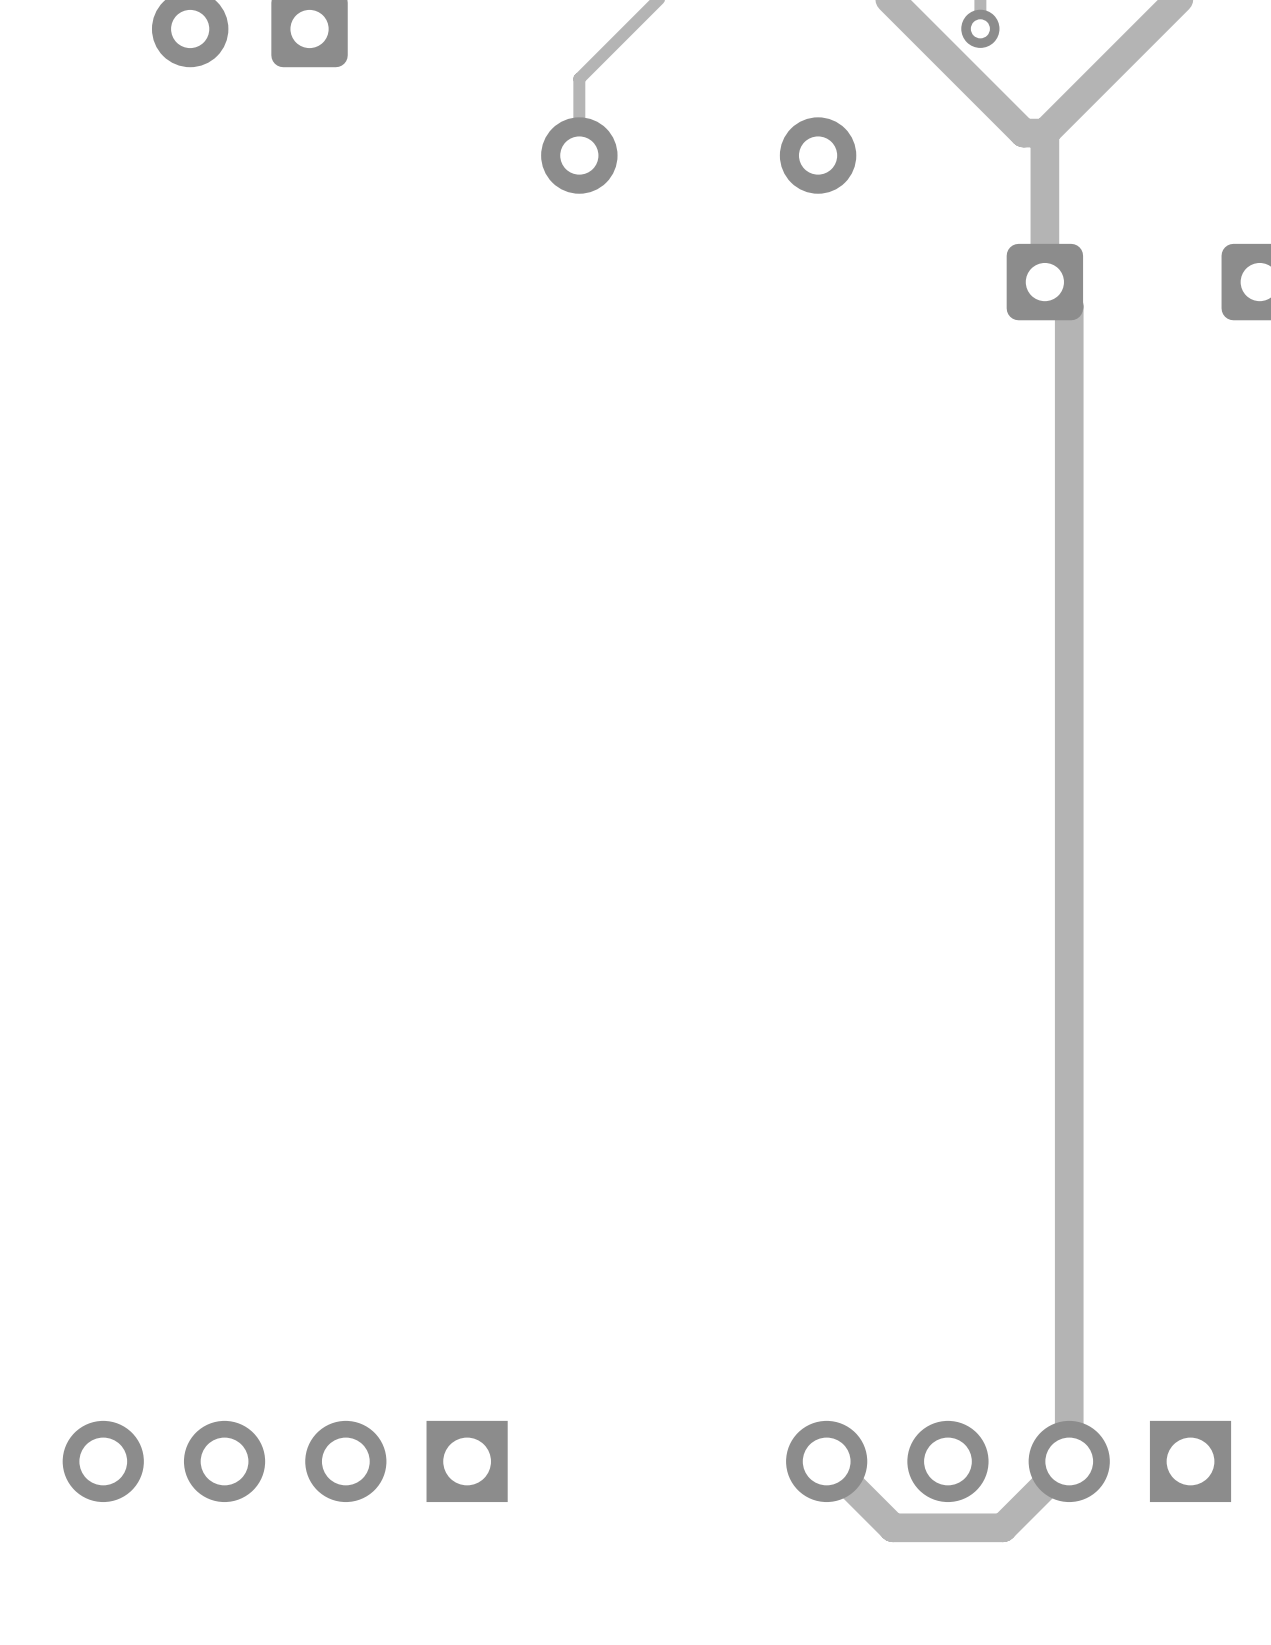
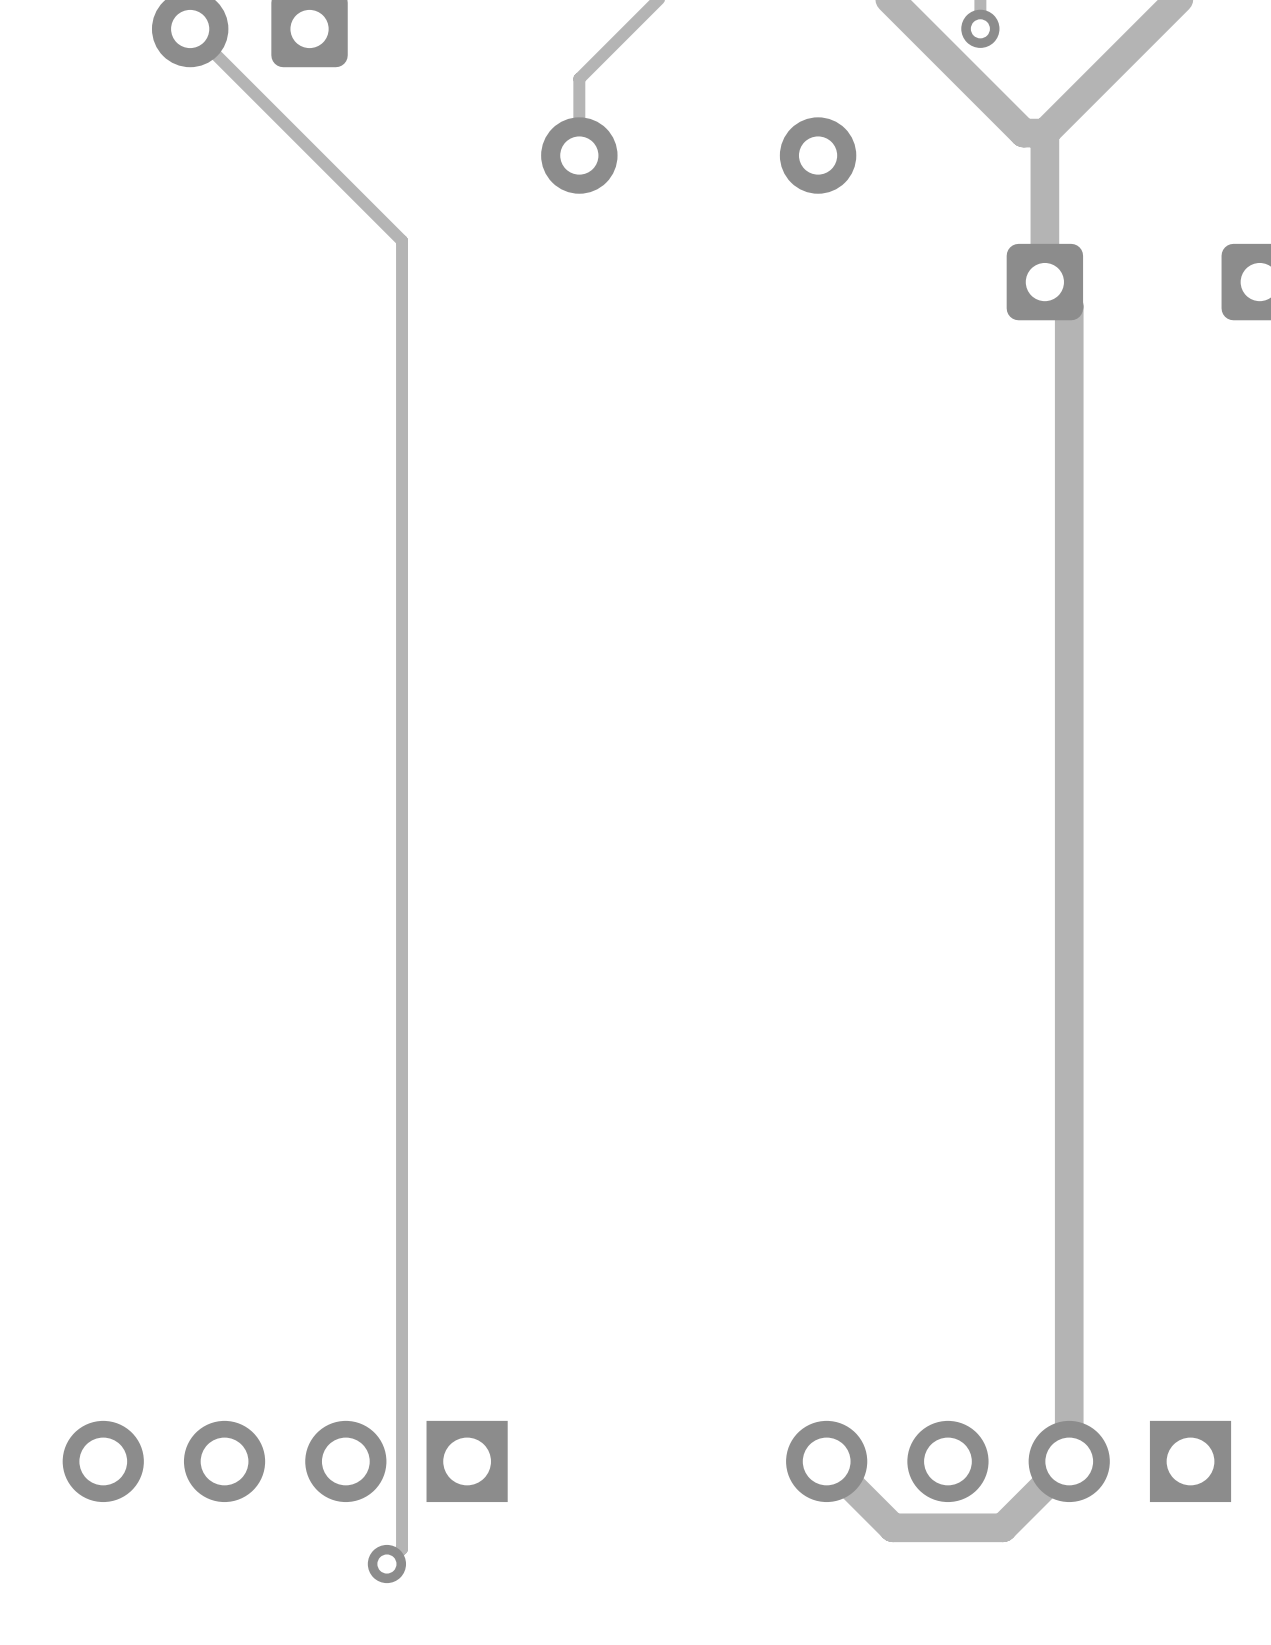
track: none -> (190, 29) (402, 240) (402, 1548) (386, 1564)
via: none -> (386, 1564)

